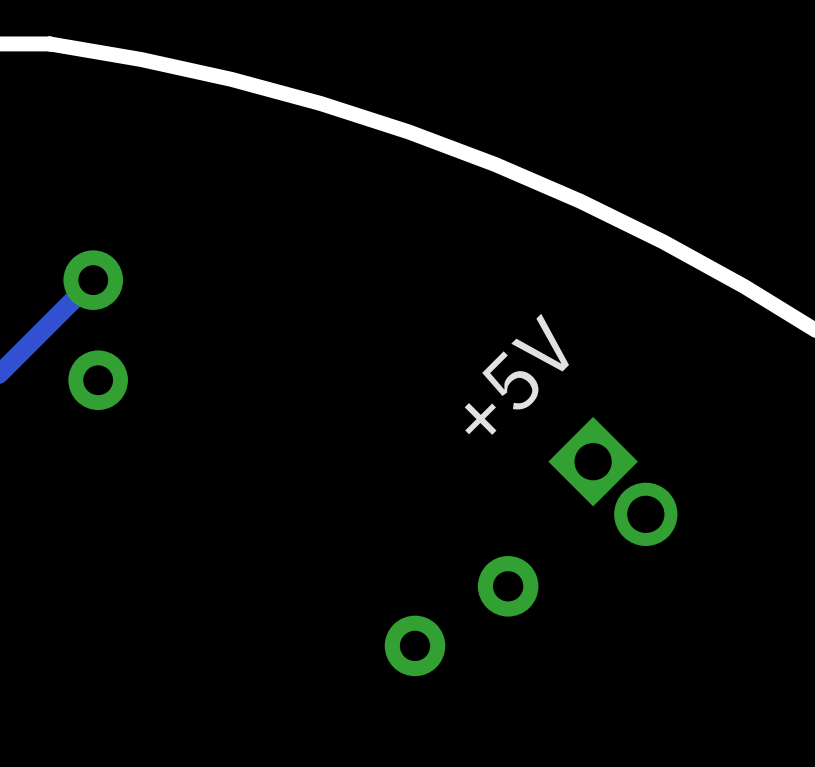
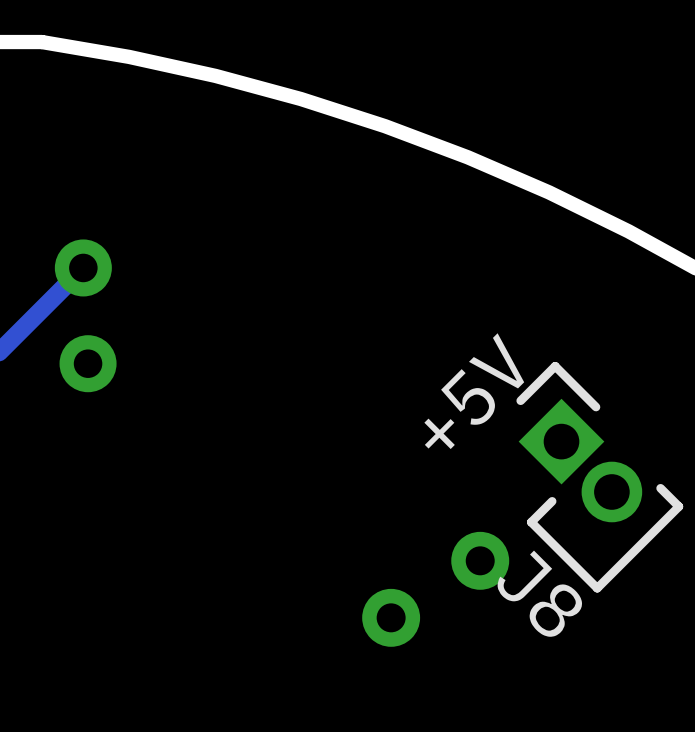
text position: +5V (516, 374) -> +5V (474, 391)
J8 side: top (612, 481) -> bottom (599, 477)

